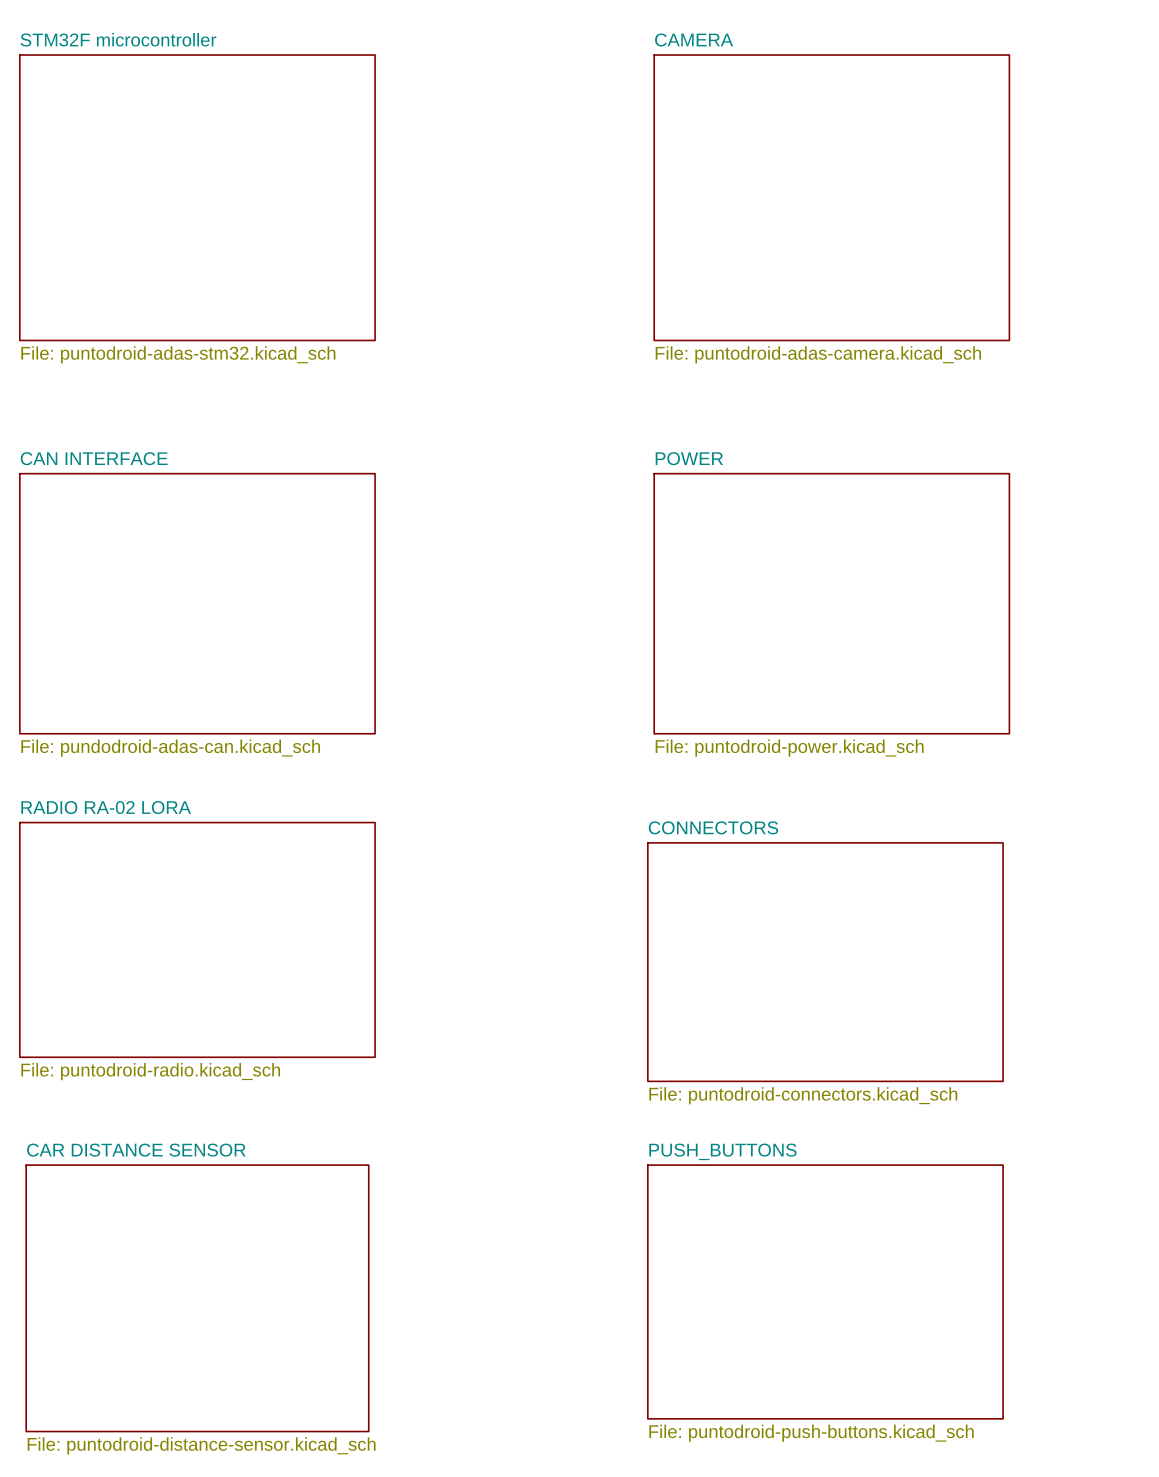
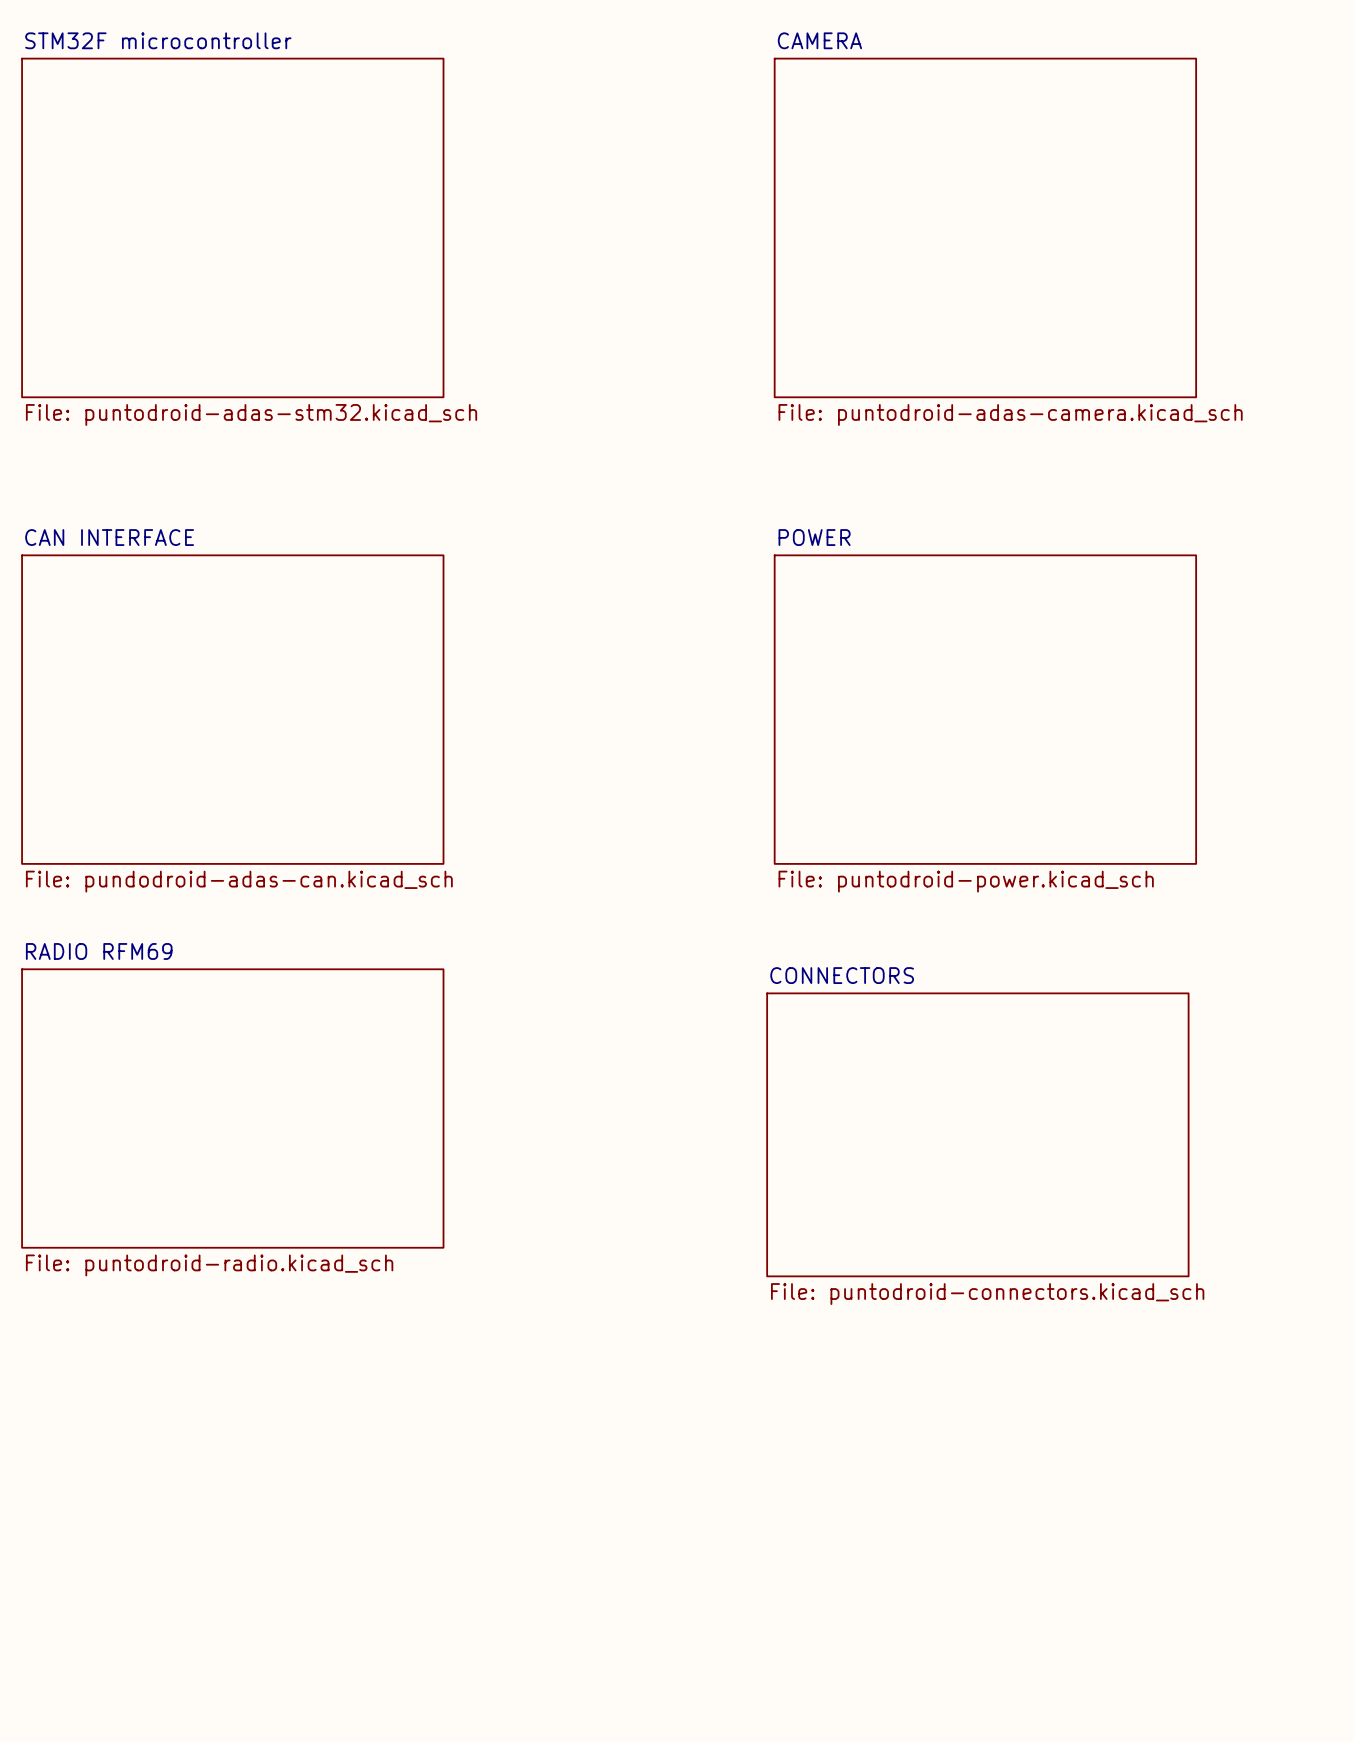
sheet RADIO RA-02 LORA name: RADIO RA-02 LORA (106, 807) -> RADIO RFM69 (99, 951)
sheet PUSH_BUTTONS: File: puntodroid-push-buttons.kicad_sch (825, 1291) -> none
sheet CAR DISTANCE SENSOR: File: puntodroid-distance-sensor.kicad_sch (197, 1298) -> none

